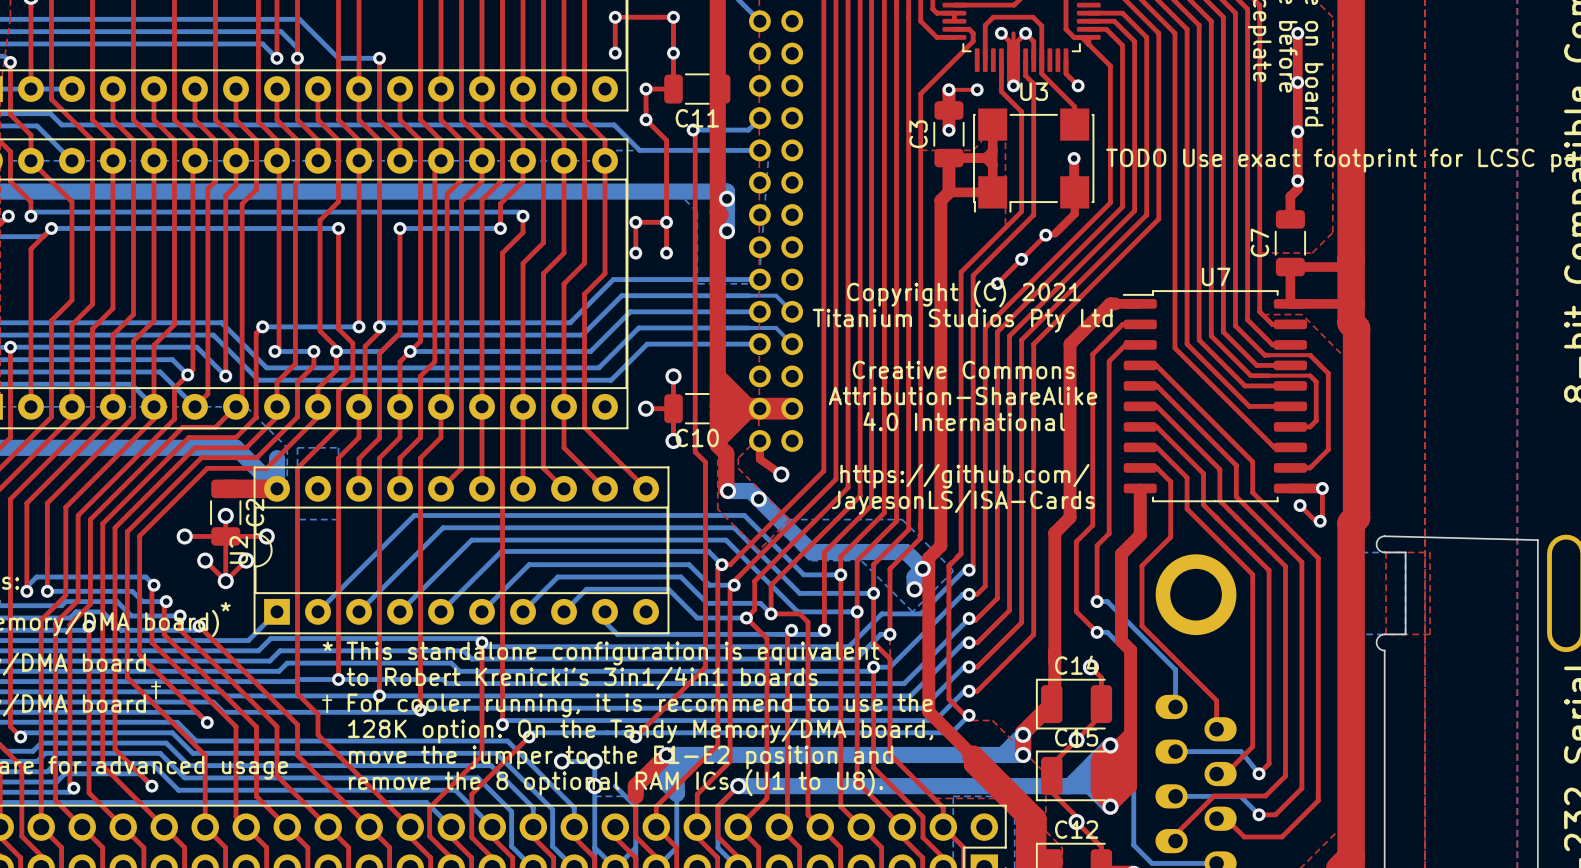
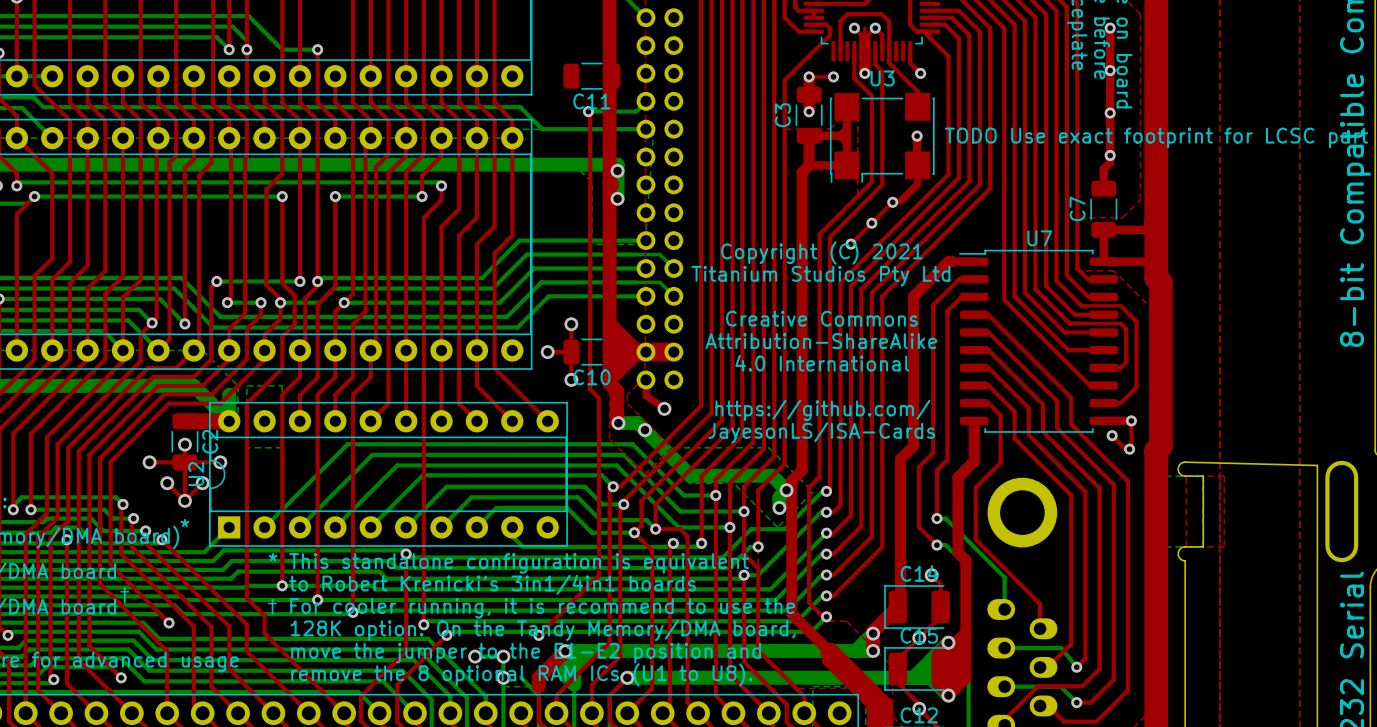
via: (615, 17) -> none
via: (673, 17) -> none
top track: (615, 53) (615, 17) (673, 17) (673, 89) (646, 89) (646, 119) (666, 140) (666, 253) -> none
via: (615, 53) -> none
via: (673, 53) -> none
via: (646, 89) -> none
via: (646, 119) -> none
via: (635, 222) -> none
top track: (666, 222) (635, 222) (635, 253) -> none
via: (666, 222) -> none
via: (635, 253) -> none
via: (666, 253) -> none

